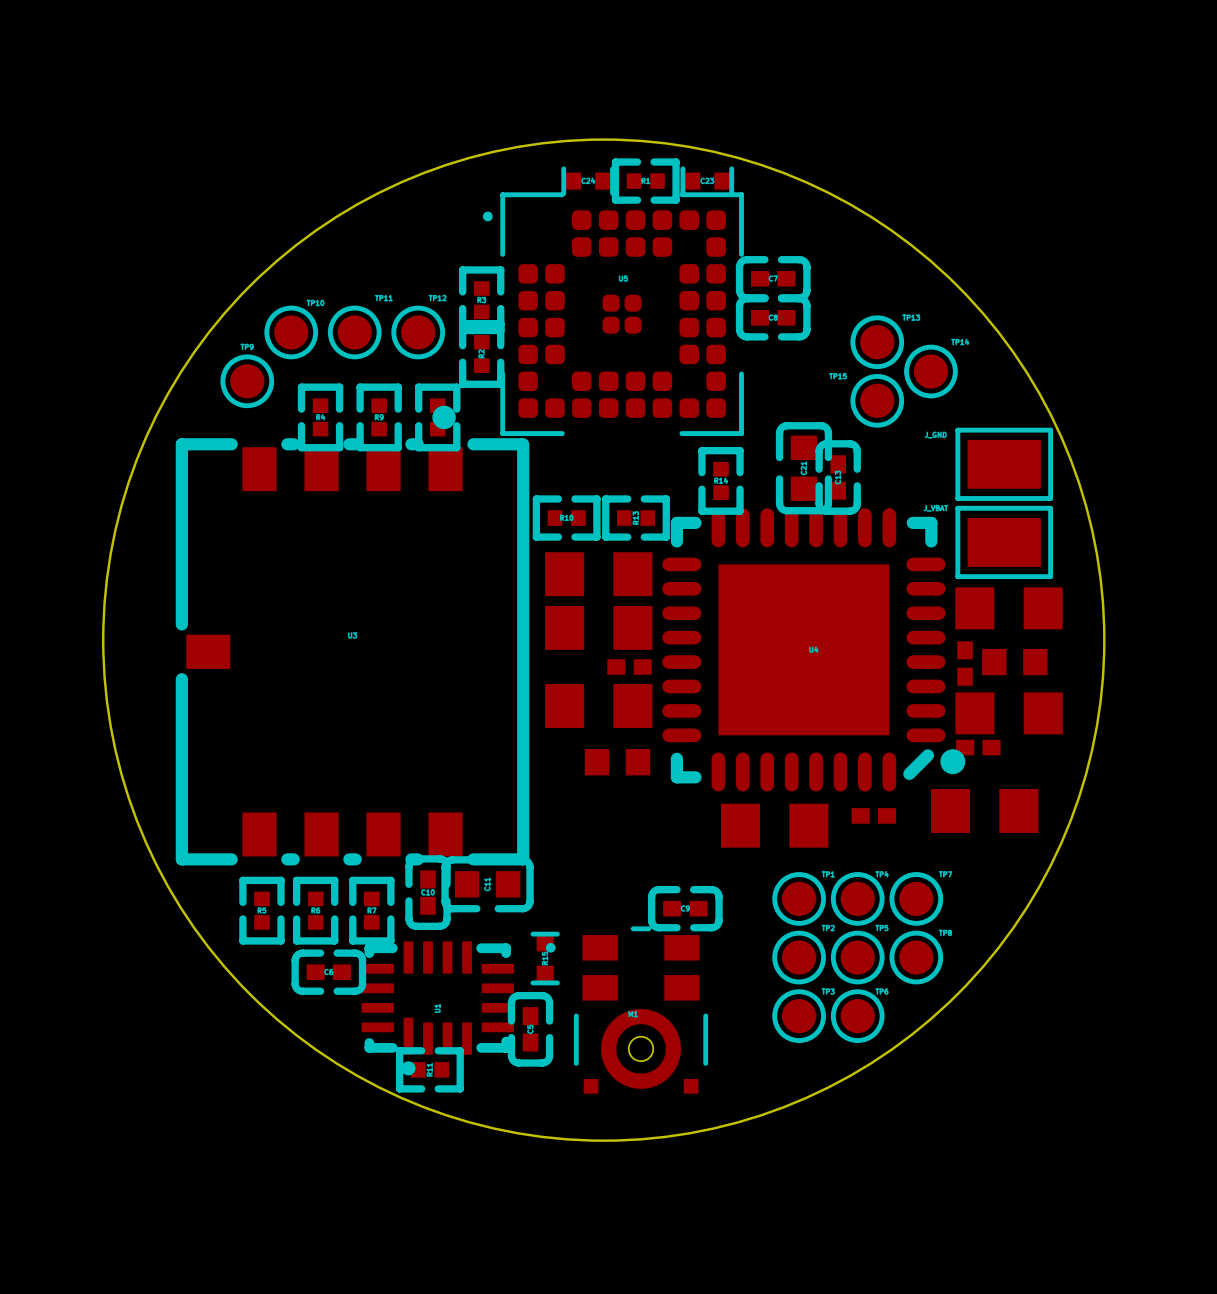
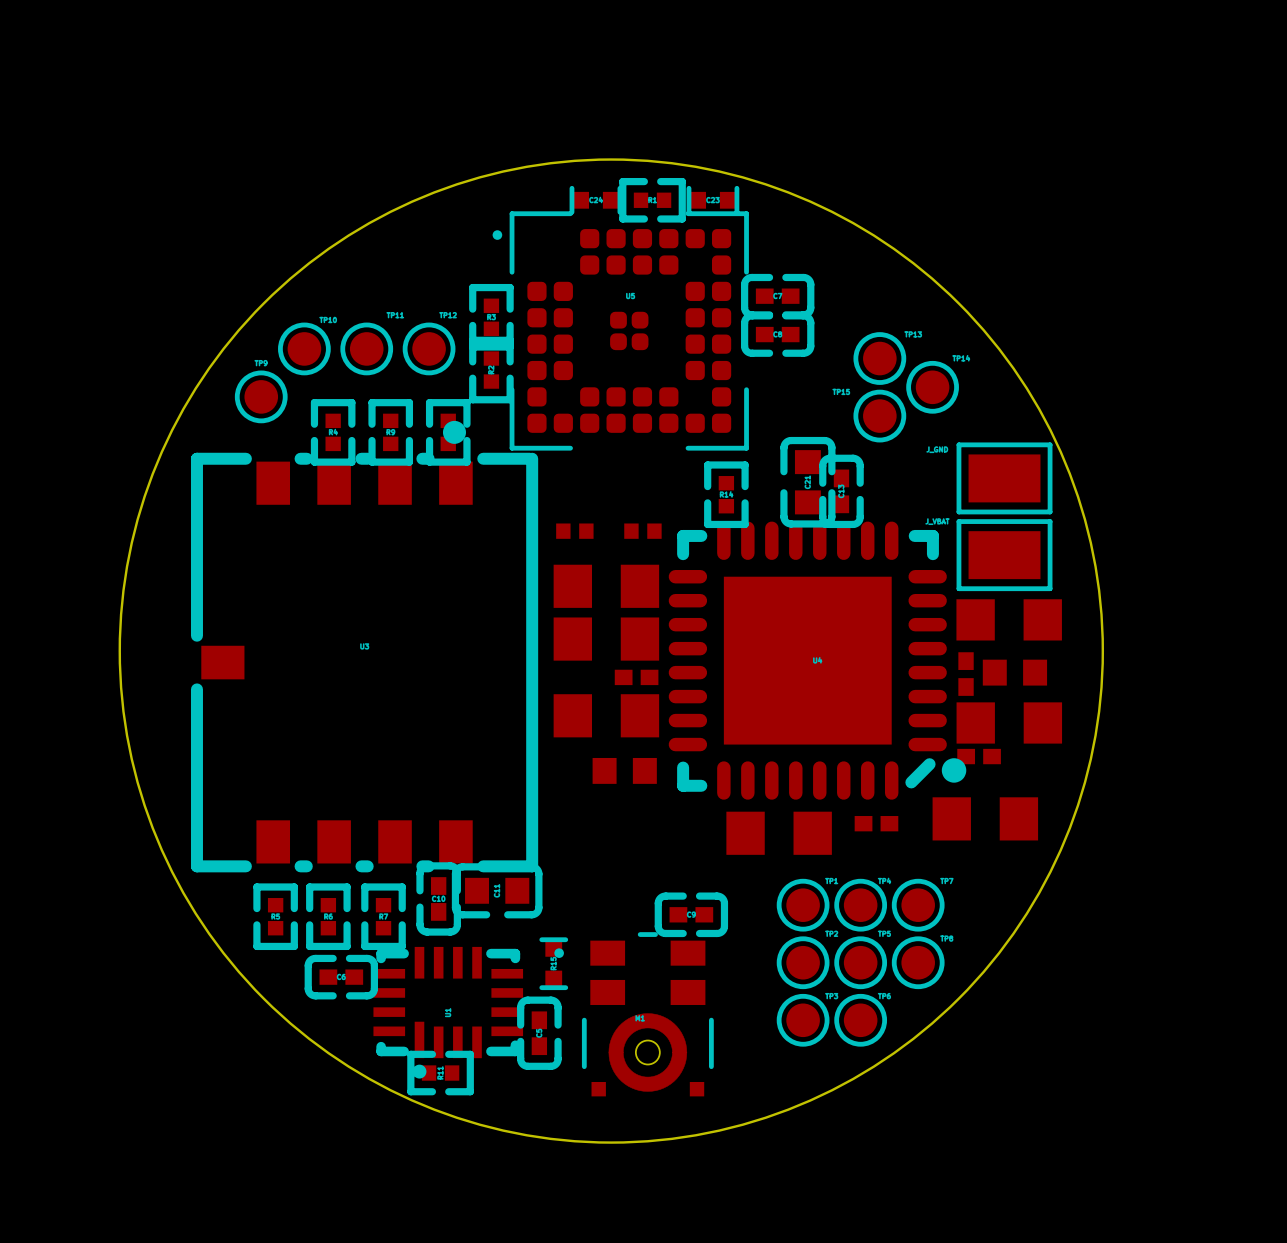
part: (566, 518) -> none
part: none -> (574, 531)
part: (636, 518) -> none
part: none -> (642, 531)

